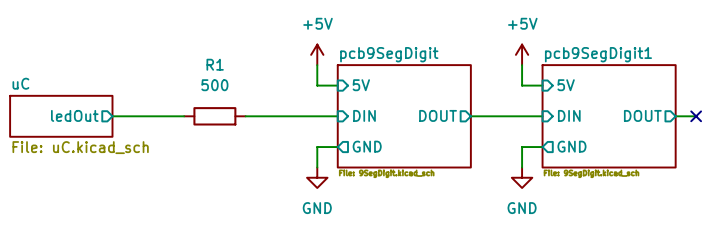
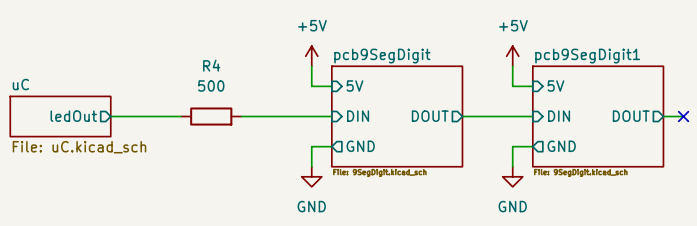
R1 name: R1 (215, 64) -> R4 (211, 65)

